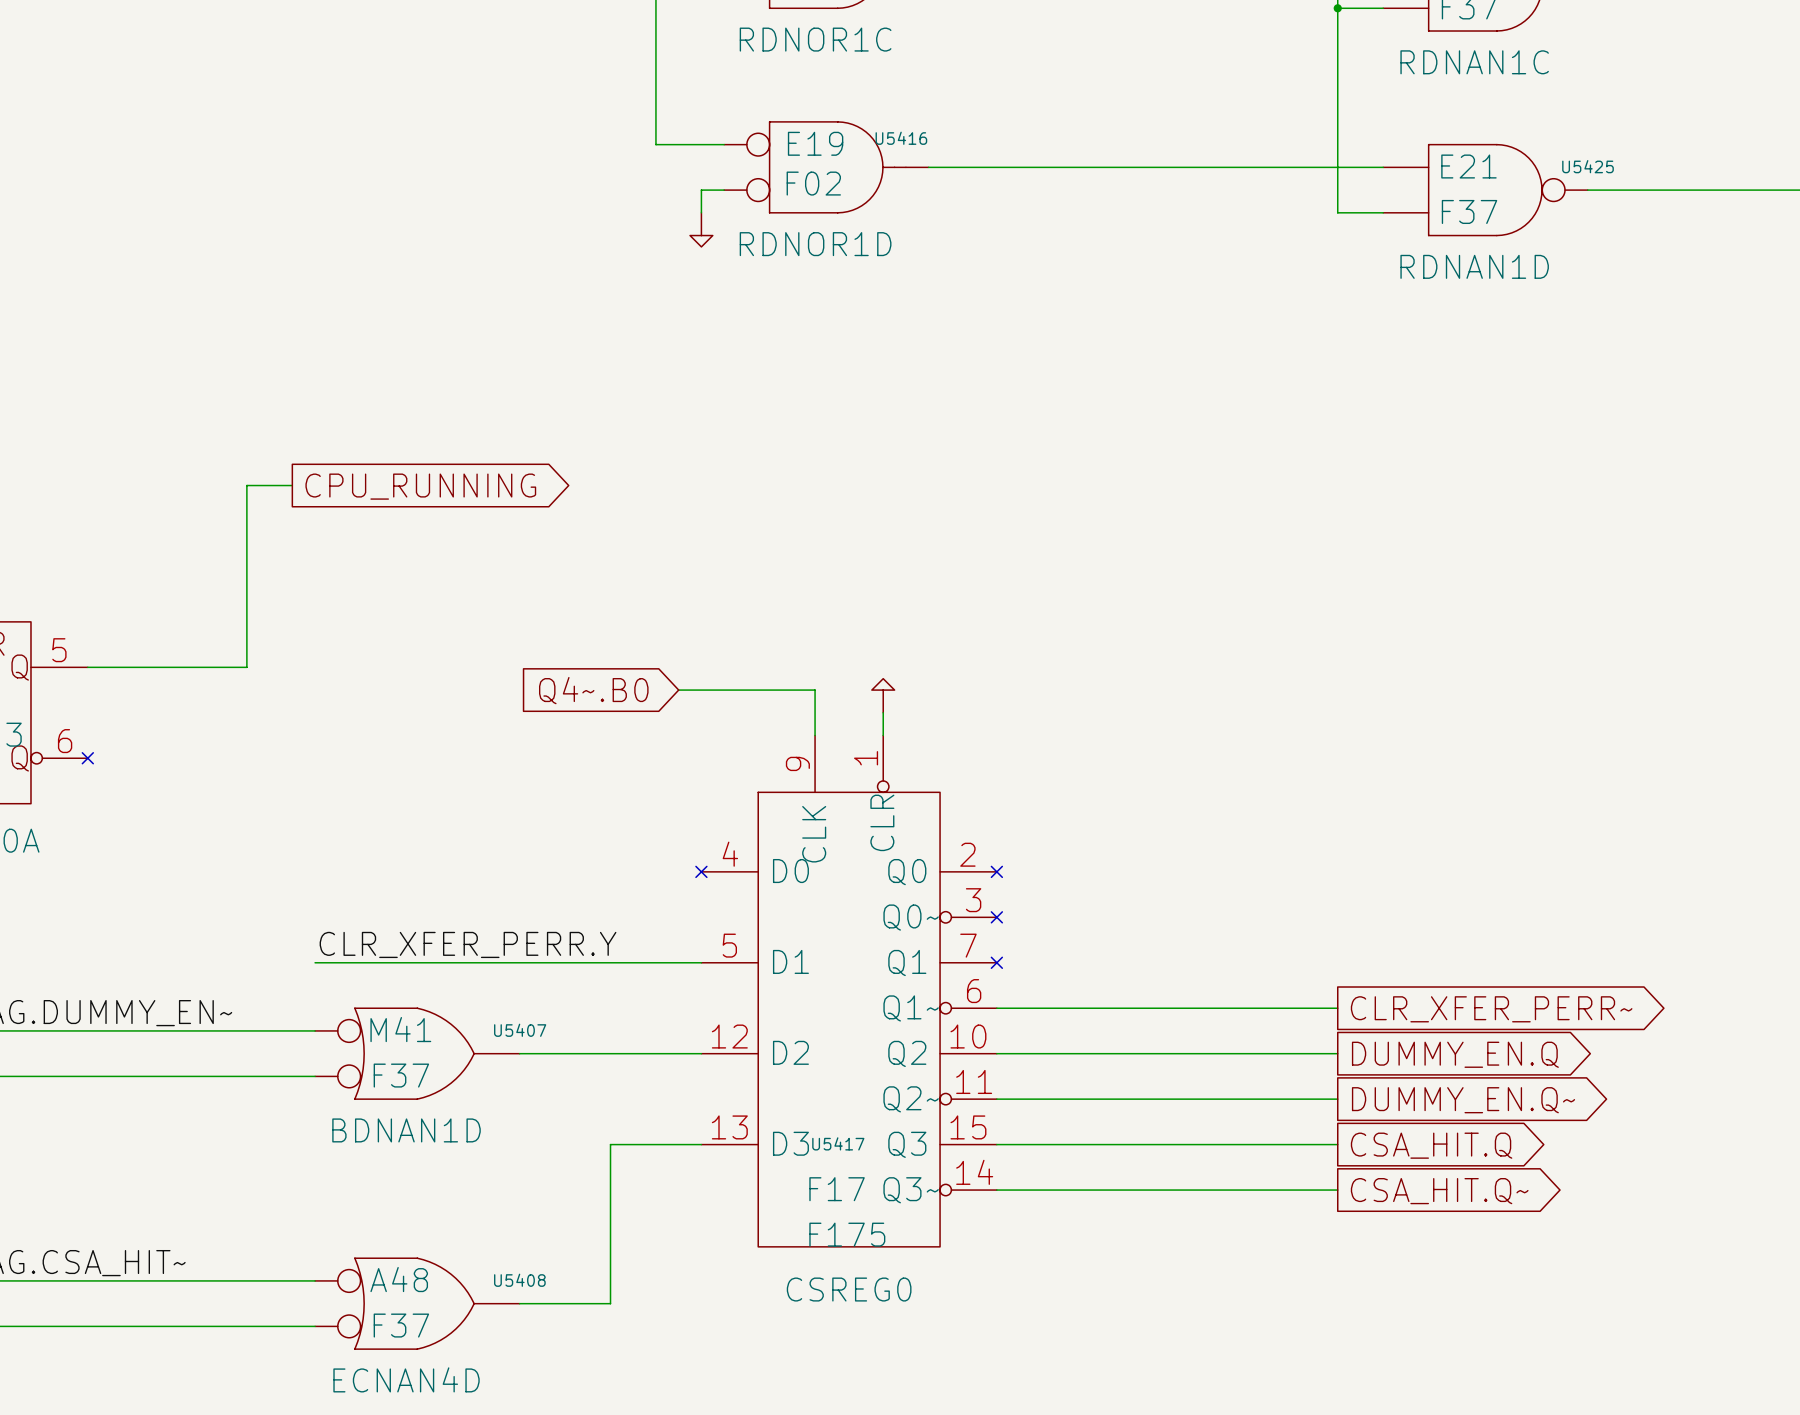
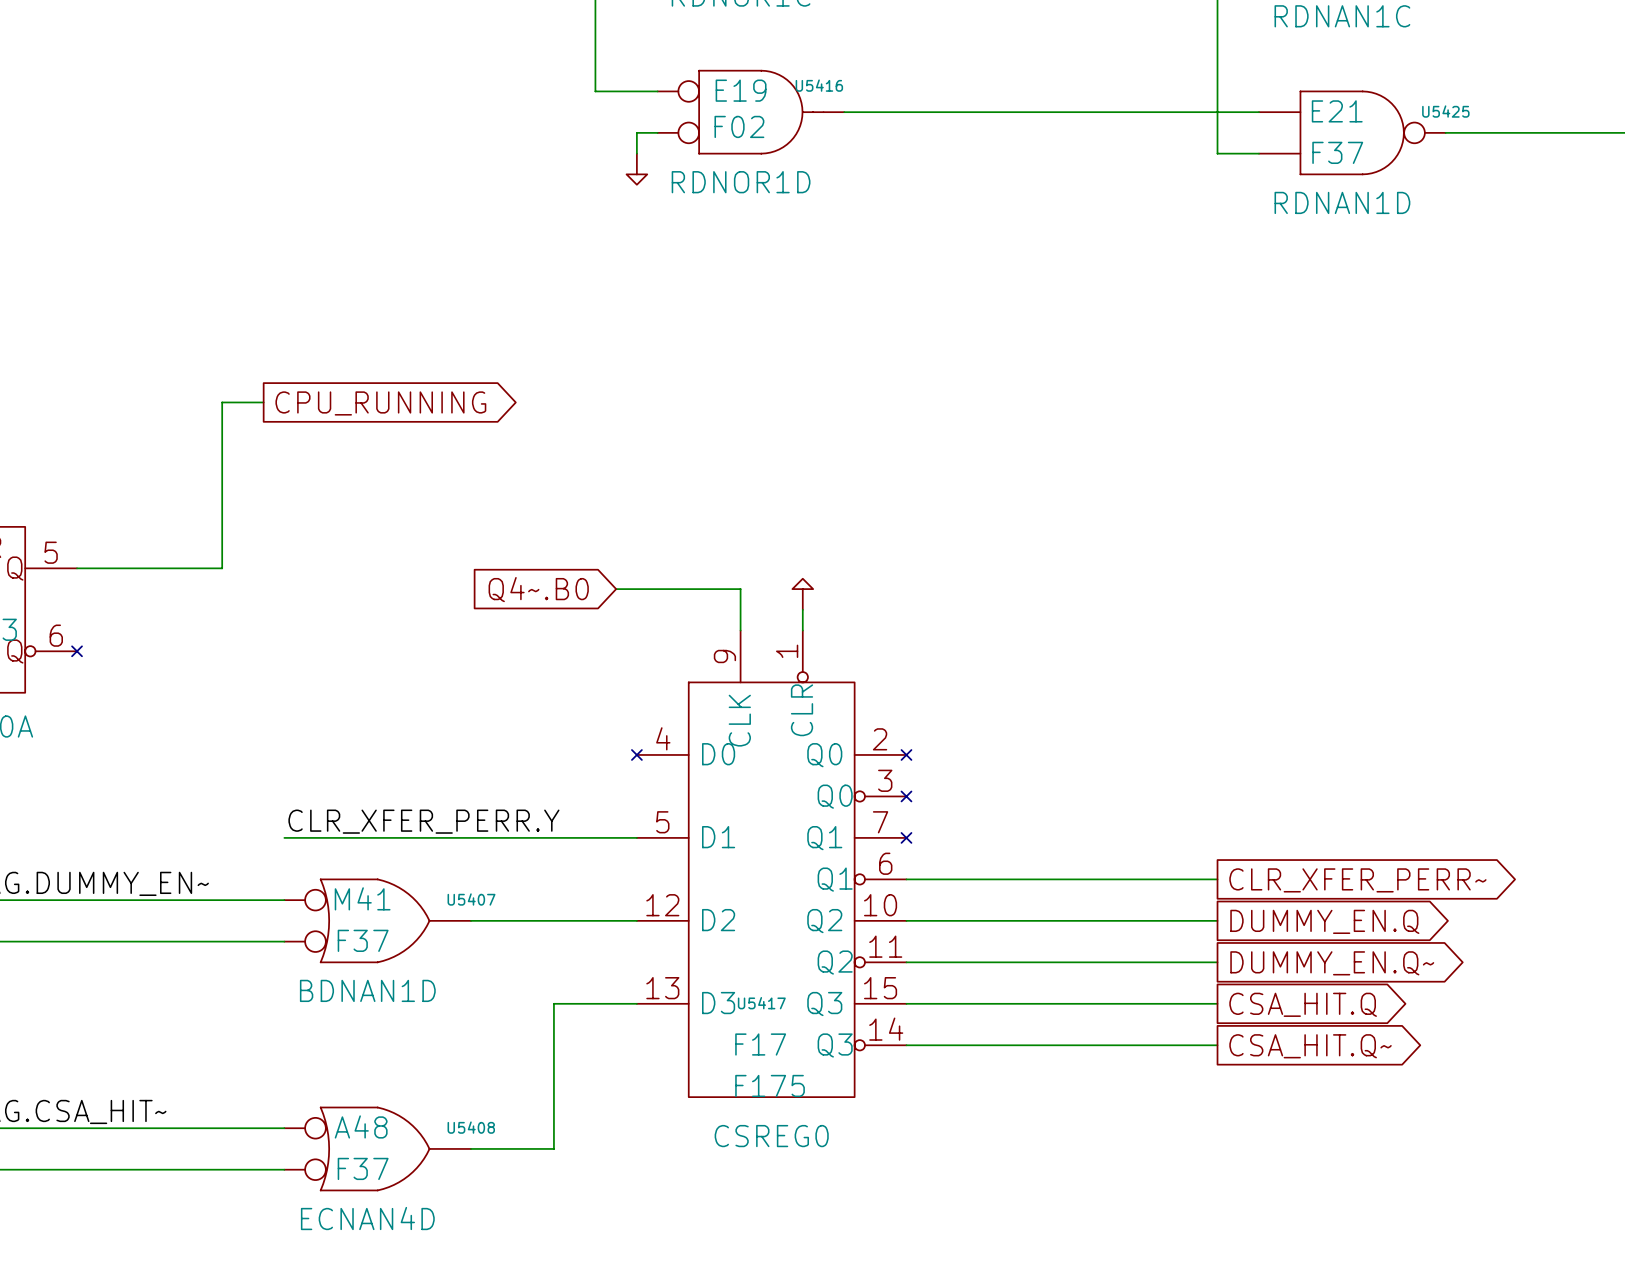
U5417 pin name: Q0~ (911, 917) -> Q0 (835, 796)
U5417 pin name: Q1~ (911, 1008) -> Q1 (835, 879)
U5417 pin name: Q2~ (911, 1099) -> Q2 (835, 962)
U5417 pin name: Q3~ (911, 1190) -> Q3 (835, 1045)

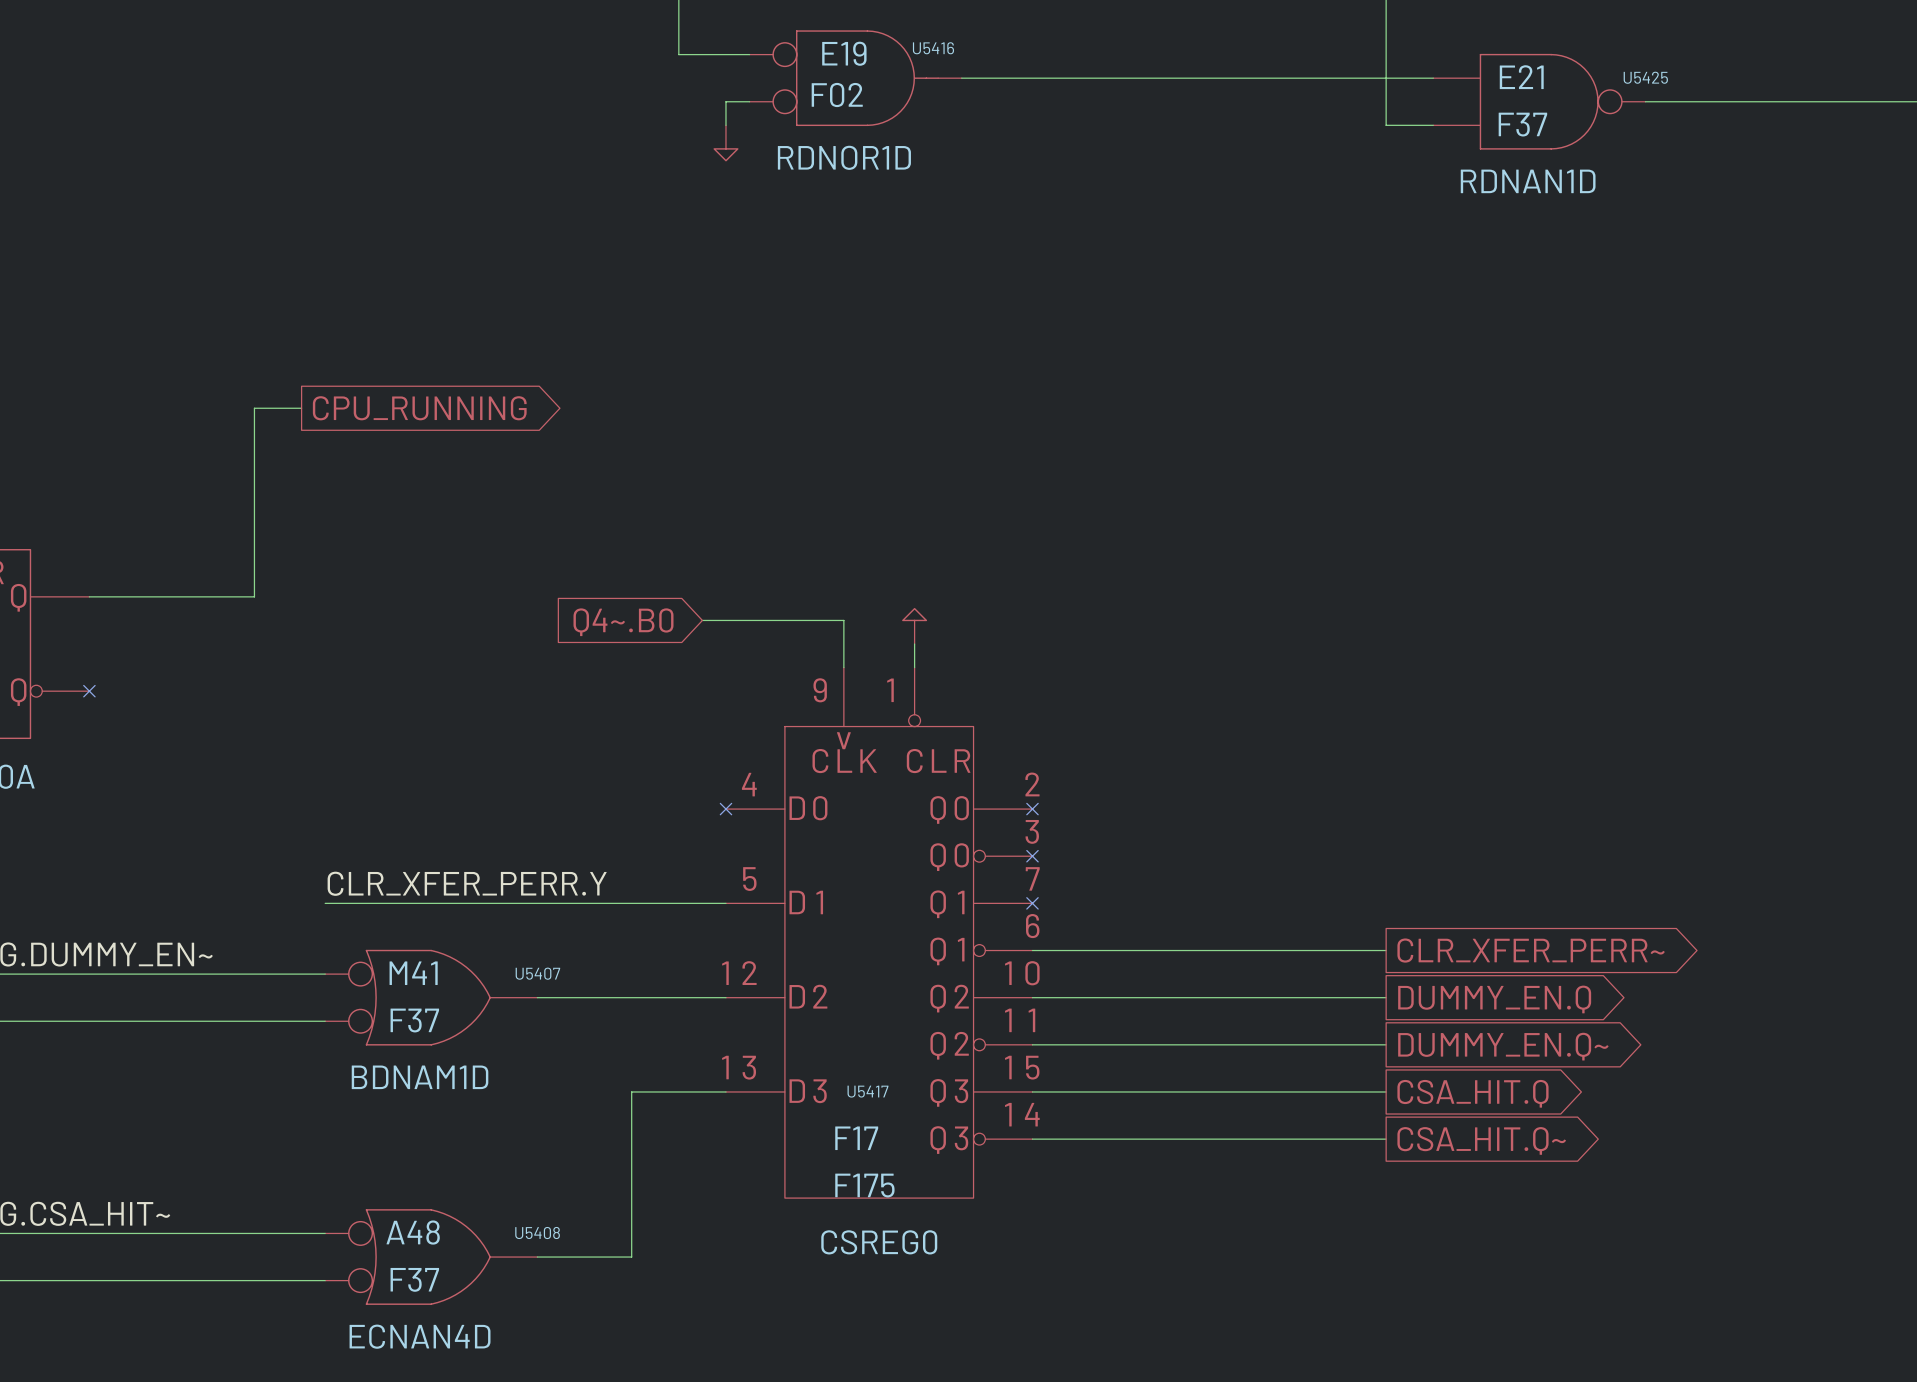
part pin number: 5 (51, 552) -> none
U5417 symbol: [636, 630, 907, 1098] -> [725, 667, 1033, 1199]
part pin number: 6 (56, 635) -> none
U5407 text: BDNAN1D (367, 990) -> BDNAM1D (420, 1077)

